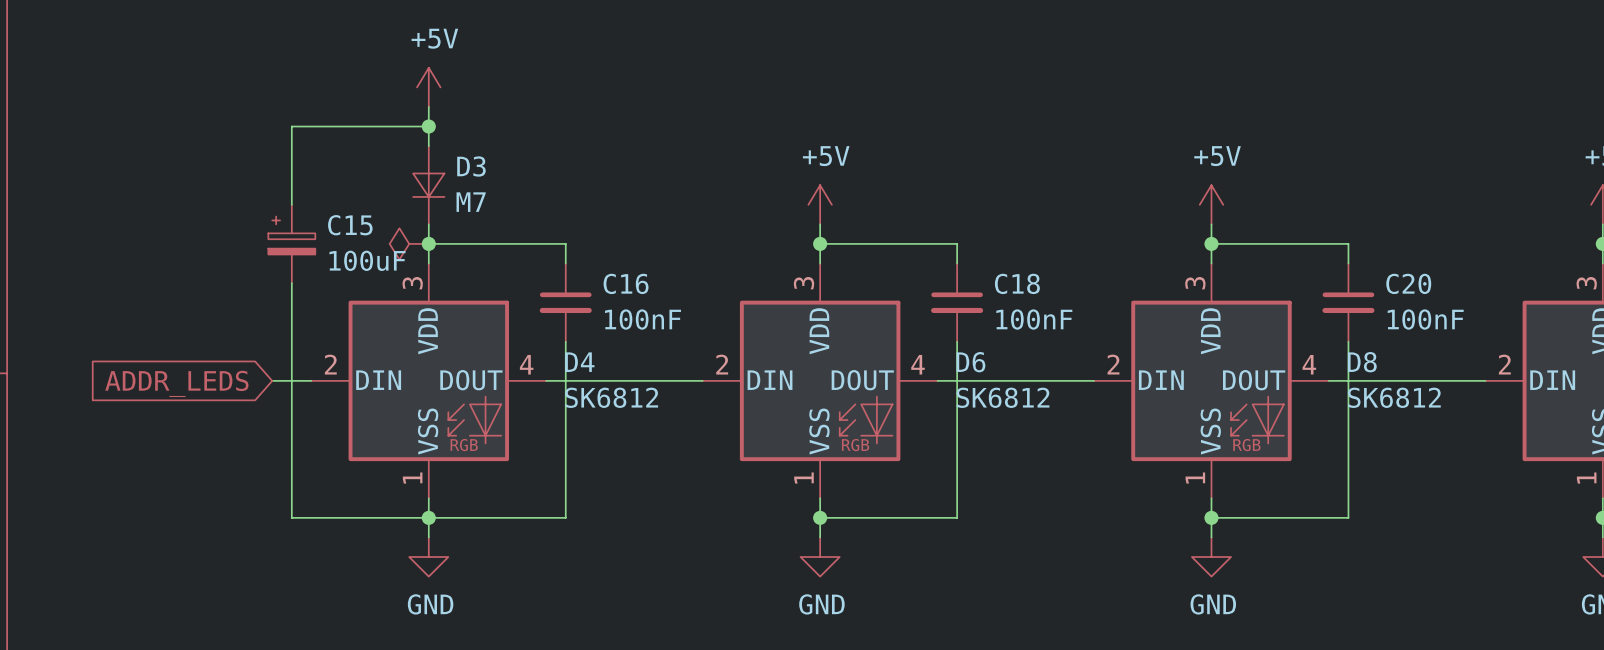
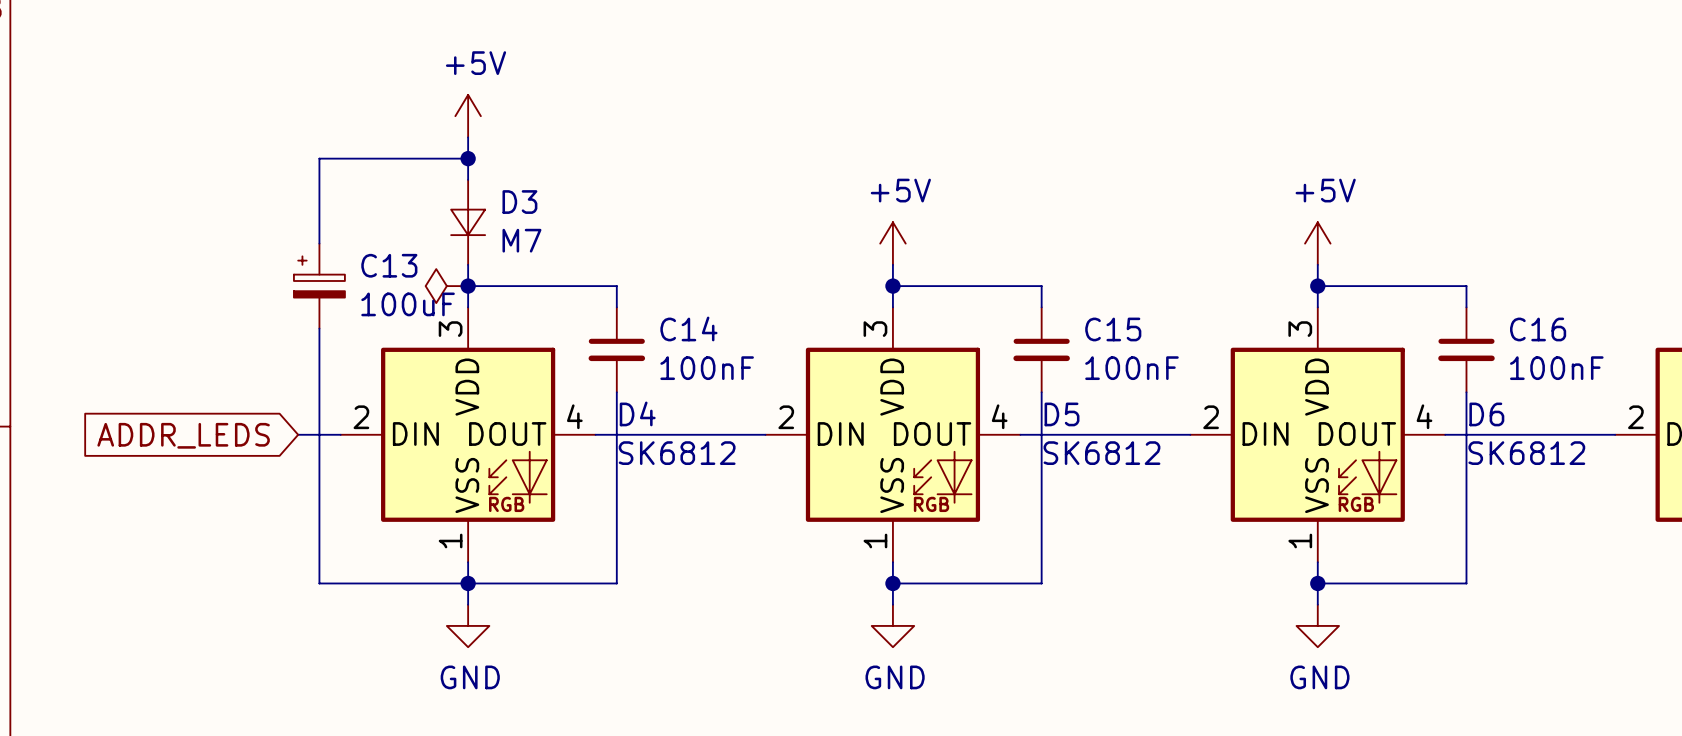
C15 name: C15 (350, 225) -> C13 (389, 265)
C16 name: C16 (626, 283) -> C14 (688, 328)
C18 name: C18 (1017, 283) -> C15 (1113, 329)
C20 name: C20 (1408, 283) -> C16 (1538, 329)
D6 name: D6 (970, 362) -> D5 (1062, 414)
D8 name: D8 (1362, 362) -> D6 (1486, 414)

